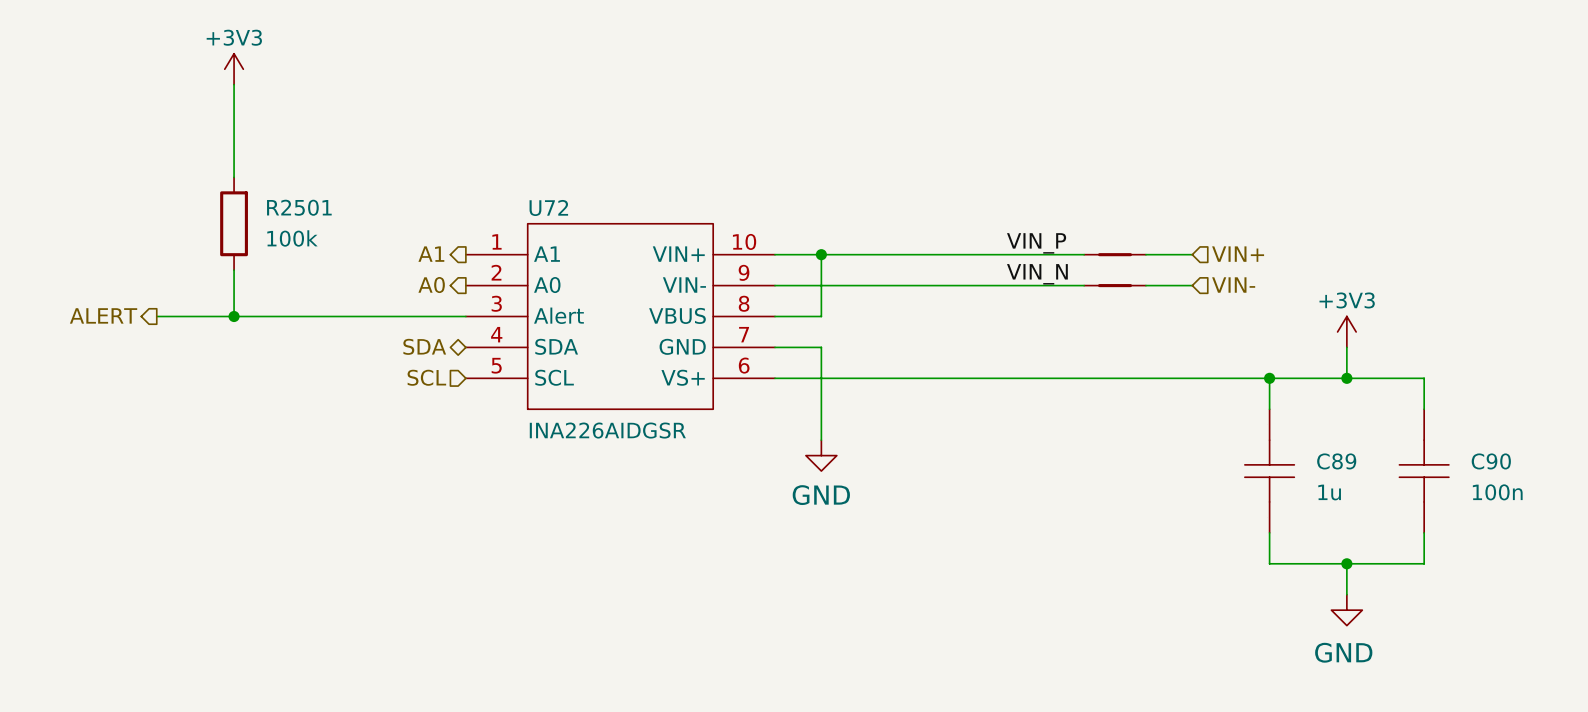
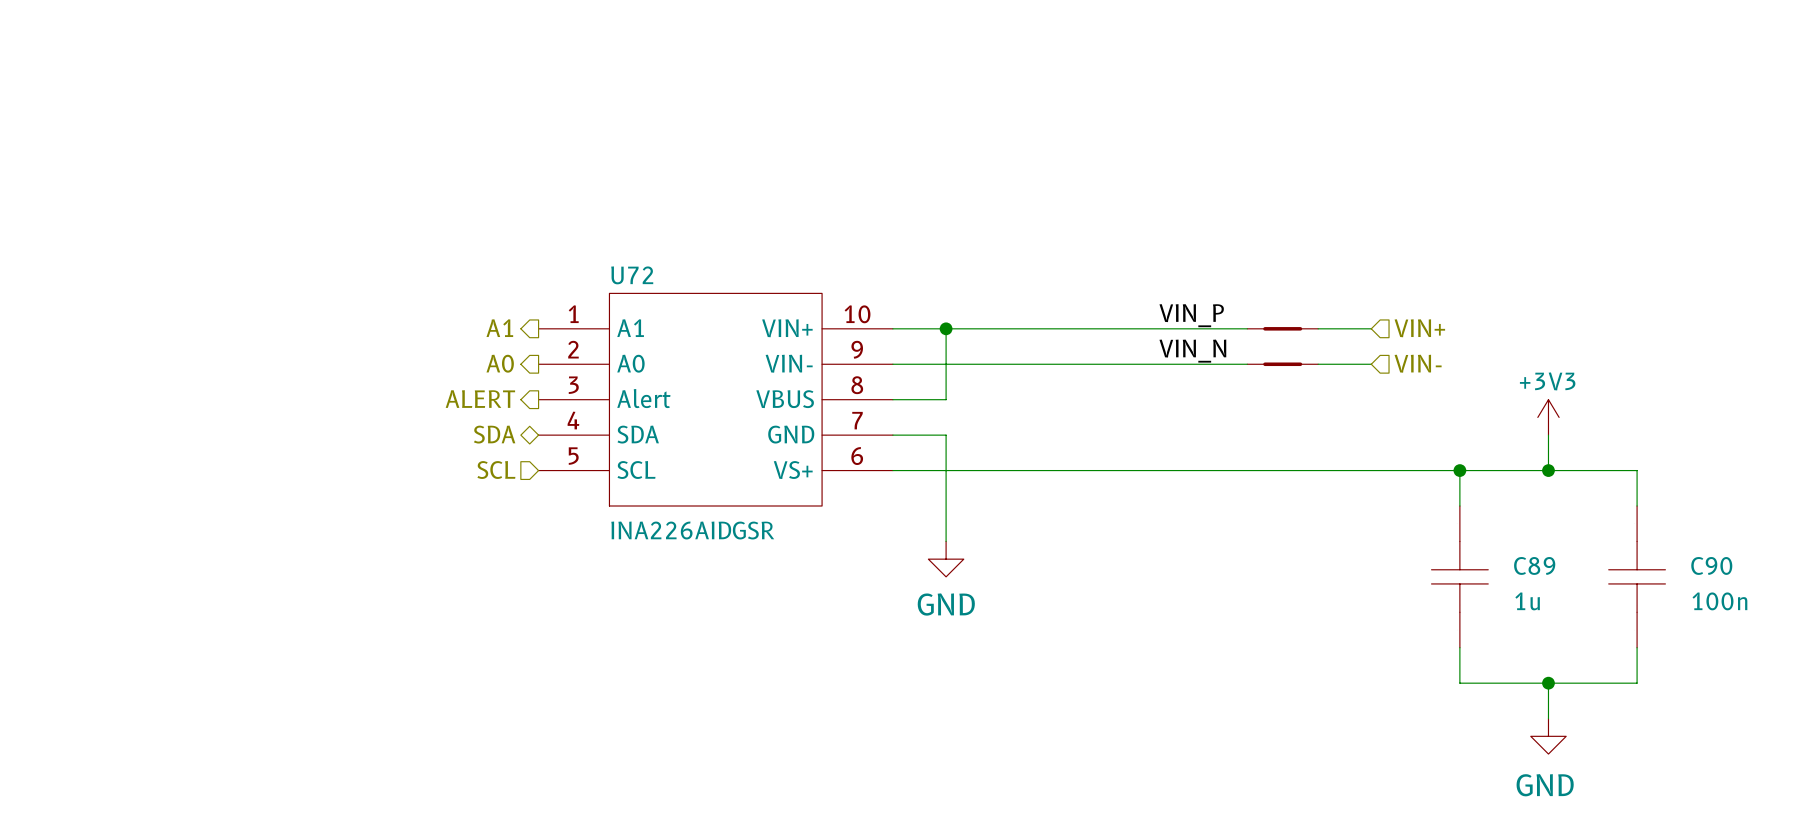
power symbol: +3V3 (234, 69) -> none
wire: (234, 84) (234, 177) -> none
R2501: 100k (234, 223) -> none
wire: (234, 270) (234, 316) -> none
hierarchical label: ALERT (103, 315) -> none
hierarchical label: none -> ALERT (480, 399)
wire: (156, 316) (465, 316) -> none
junction: (234, 316) -> none

